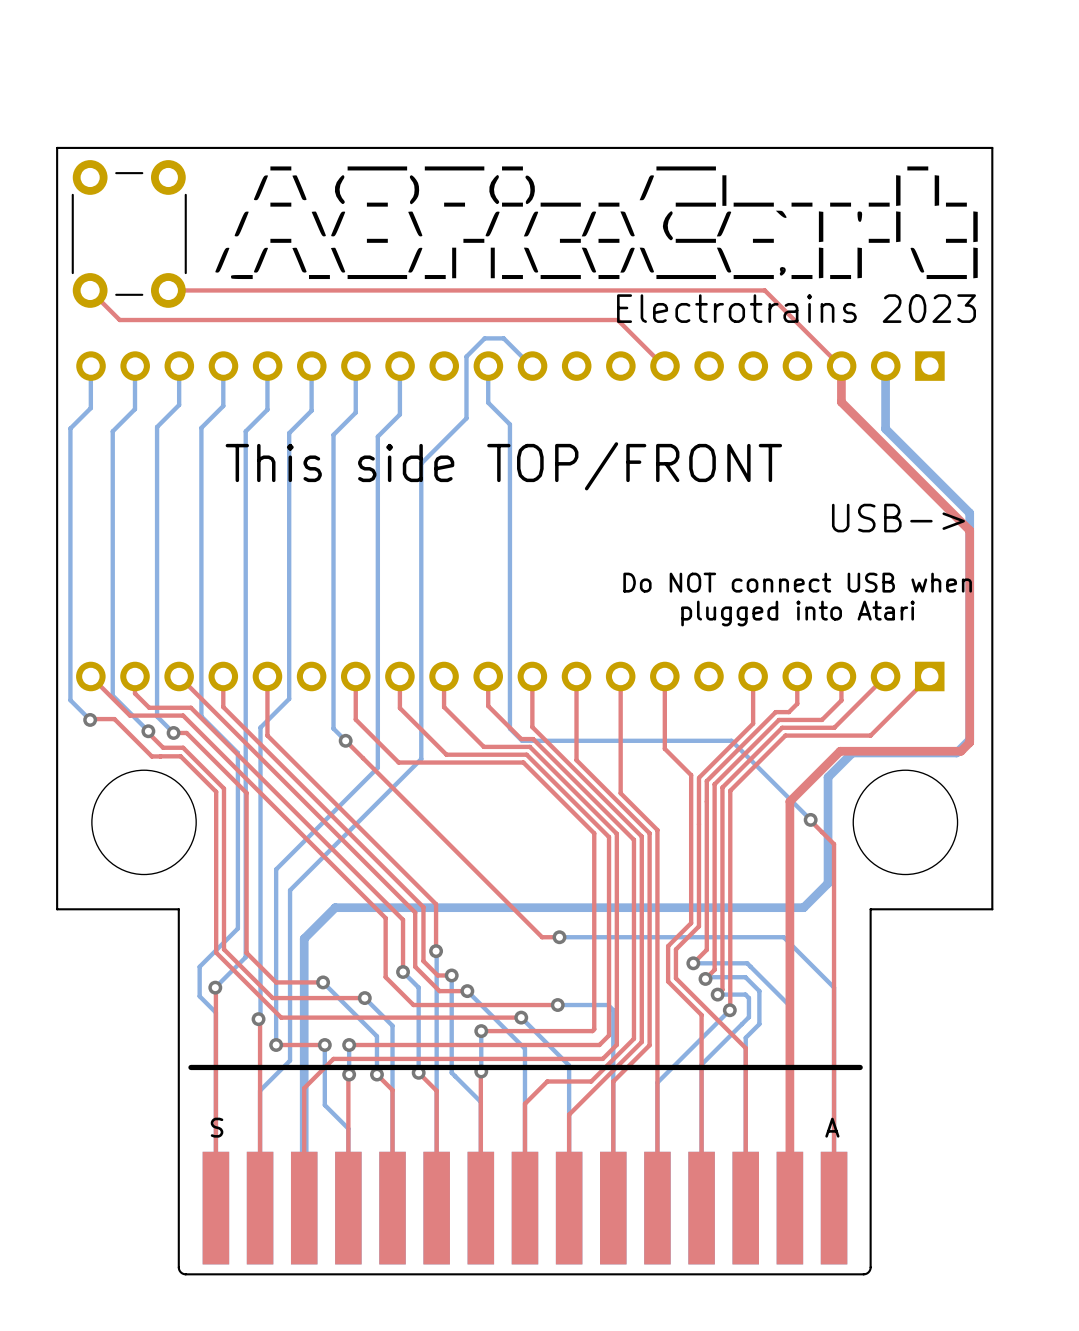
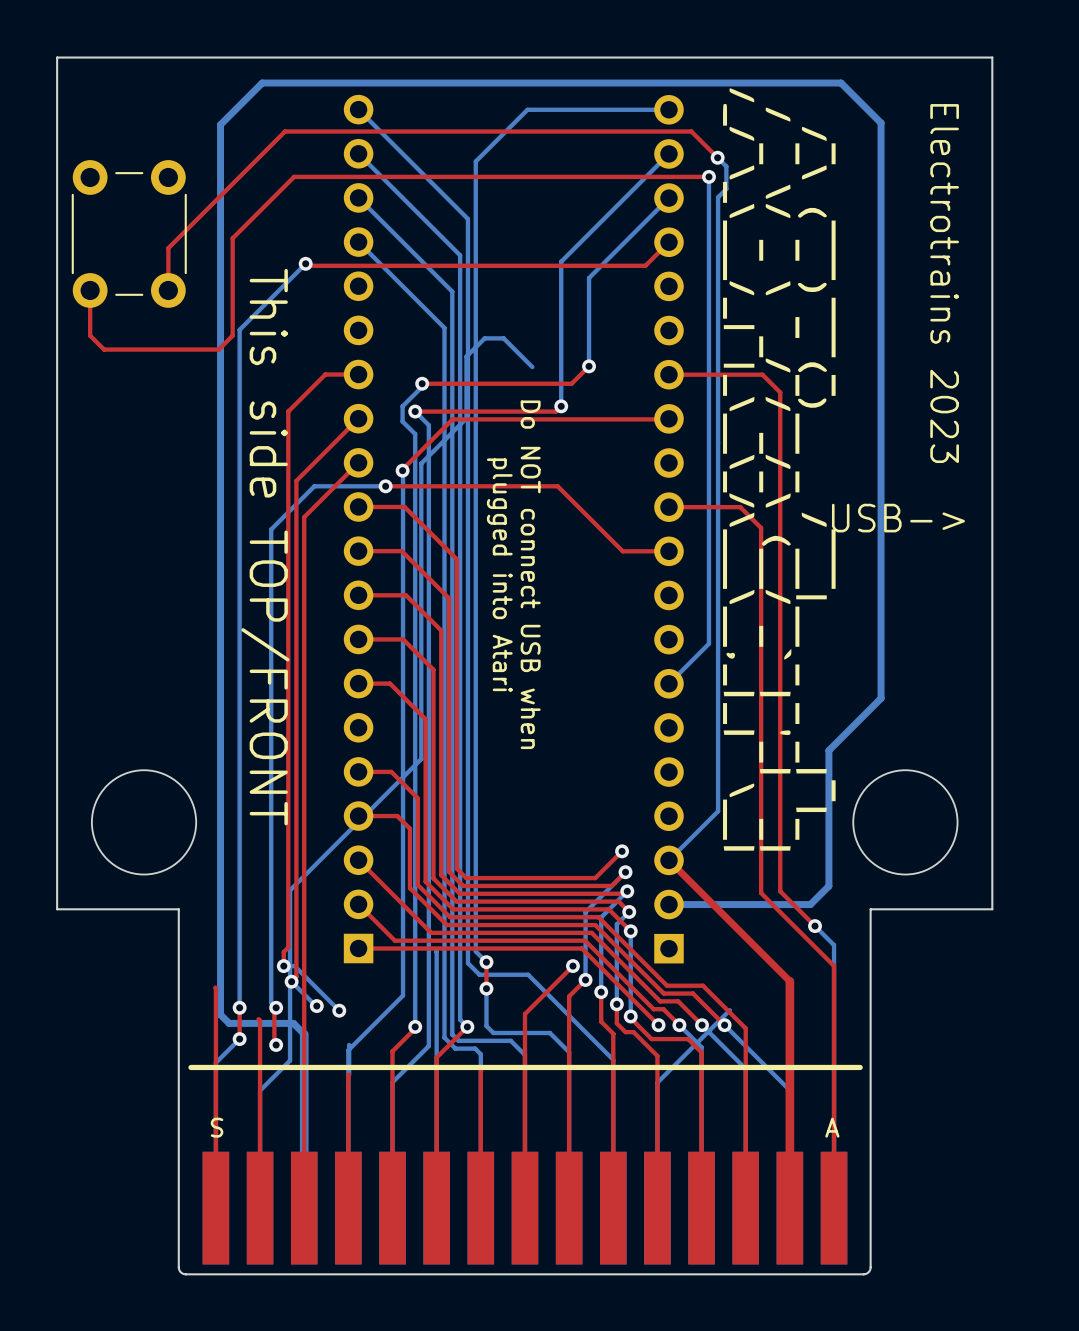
drawing: none -> [723, 88, 836, 851]
bottom track: none -> (668, 109) (527, 109) (475, 161) (475, 951) (486, 962)
bottom track: none -> (358, 153) (460, 255) (460, 1019) (467, 1026)
bottom track: none -> (668, 153) (561, 261) (561, 406)
top track: none -> (717, 157) (691, 131) (285, 131) (168, 248) (168, 290)
bottom track: none -> (717, 157) (726, 166) (726, 189) (718, 197) (718, 811) (668, 860)
via: none -> (717, 157)
drawing: [215, 166, 978, 280] -> none
bottom track: none -> (708, 176) (708, 643) (668, 683)
via: none -> (708, 176)
bottom track: none -> (668, 198) (589, 278) (589, 366)
top track: none -> (668, 242) (645, 265) (307, 265) (305, 263)
bottom track: none -> (305, 263) (239, 329) (239, 1007)
via: none -> (305, 263)
top track: (90, 290) (119, 320) (617, 320) (664, 367) -> (90, 290) (90, 335) (104, 349) (218, 349) (232, 335) (232, 238) (294, 176) (708, 176)
top track: (168, 290) (764, 290) (841, 367) (841, 402) (969, 530) (969, 742) (961, 751) (840, 751) (789, 801) (789, 981) -> (668, 860) (789, 981)
text rotation: 0° (796, 308) -> 90° clockwise (944, 283)
part: (510, 366) -> none
top track: none -> (589, 366) (571, 383) (422, 383)
via: none -> (589, 366)
bottom track: (90, 367) (90, 408) (70, 428) (70, 700) (90, 719) -> none
bottom track: (134, 367) (134, 409) (112, 431) (112, 695) (148, 731) -> none
bottom track: (179, 367) (179, 404) (157, 427) (157, 716) (173, 732) -> none
bottom track: (223, 367) (223, 406) (201, 427) (201, 716) (237, 752) (237, 928) (199, 966) (199, 996) (215, 1012) (215, 1062) -> (239, 1039) (215, 1062)
bottom track: (267, 367) (267, 409) (245, 431) (245, 957) (215, 987) -> none
bottom track: (311, 367) (311, 410) (289, 433) (289, 698) (260, 727) (260, 1017) (258, 1019) -> none
bottom track: (355, 367) (355, 412) (333, 434) (333, 728) (345, 740) -> none
bottom track: (399, 367) (399, 414) (377, 436) (377, 767) (276, 869) (276, 1045) -> none
bottom track: (488, 367) (488, 402) (509, 424) (509, 728) (522, 740) (731, 740) (810, 819) -> none
bottom track: (885, 367) (885, 428) (969, 513) (969, 739) (956, 752) (852, 752) (828, 777) (828, 883) (803, 907) (335, 907) (304, 938) (304, 1034) -> (668, 904) (810, 904) (828, 886) (828, 750) (881, 698) (881, 123) (841, 83) (262, 83) (220, 124) (220, 1014) (229, 1023) (293, 1023) (304, 1034)
top track: none -> (358, 374) (325, 374) (288, 411) (288, 947) (283, 952) (283, 966)
top track: none -> (668, 374) (762, 374) (780, 392) (780, 891) (815, 926)
via: none -> (422, 383)
bottom track: none -> (420, 385) (422, 383) (422, 386) (402, 406) (402, 421) (415, 434) (415, 1026)
top track: none -> (561, 406) (556, 411) (415, 411)
via: none -> (561, 406)
via: none -> (415, 411)
top track: none -> (358, 418) (296, 480) (296, 976) (291, 981)
top track: none -> (668, 418) (452, 419) (402, 470)
text rotation: 0° (503, 466) -> 90° clockwise (265, 547)
via: none -> (402, 470)
top track: none -> (385, 486) (557, 486) (622, 551) (668, 551)
bottom track: none -> (385, 486) (314, 486) (271, 529) (271, 1002) (276, 1007)
via: none -> (385, 486)
top track: none -> (358, 506) (404, 506) (456, 559) (456, 868) (466, 878) (595, 878) (622, 851)
part: none -> (358, 529)
part: none -> (668, 529)
top track: none -> (358, 551) (401, 551) (449, 598) (449, 871) (463, 885) (611, 885) (625, 872)
text rotation: 0° (797, 582) -> 90° clockwise (530, 574)
top track: none -> (358, 595) (405, 595) (441, 630) (441, 875) (459, 893) (624, 893) (627, 891)
text rotation: 0° (798, 613) -> 90° clockwise (499, 575)
top track: none -> (358, 639) (403, 639) (433, 669) (433, 878) (456, 901) (618, 901) (629, 911)
part: none -> (524, 665)
top track: (90, 676) (129, 715) (183, 715) (385, 918) (385, 977) (413, 1005) (557, 1005) -> none
top track: (134, 676) (134, 693) (149, 707) (190, 707) (403, 919) (403, 971) -> none
top track: (179, 676) (415, 912) (415, 966) (439, 991) (467, 991) -> none
top track: (223, 676) (223, 707) (423, 907) (423, 961) (437, 975) (451, 975) -> none
top track: (267, 676) (267, 735) (436, 904) (436, 951) -> none
top track: (355, 676) (355, 719) (398, 762) (523, 762) (594, 833) (594, 1029) (592, 1031) (481, 1031) -> none
top track: (399, 676) (399, 708) (446, 754) (526, 754) (609, 837) (609, 1035) (599, 1045) (349, 1045) -> none
top track: (444, 676) (444, 707) (483, 746) (529, 746) (616, 833) (616, 1004) -> none
top track: (488, 676) (488, 706) (521, 739) (533, 739) (633, 839) (633, 1038) (591, 1081) (547, 1081) (524, 1103) -> (572, 966) (524, 1014) (524, 1103)
part: (510, 676) -> none
top track: (532, 676) (532, 727) (641, 836) (641, 1042) (569, 1114) -> (585, 979) (569, 996) (569, 1114)
top track: (576, 676) (576, 760) (649, 833) (649, 1045) (613, 1081) -> (613, 1033) (613, 1081)
top track: (620, 676) (620, 793) (657, 830) (657, 1055) -> (616, 1023) (625, 1032) (633, 1032) (657, 1055)
top track: (664, 676) (664, 748) (691, 775) (691, 923) (668, 946) (668, 981) (701, 1015) (701, 1052) -> (630, 1016) (651, 1039) (688, 1039) (701, 1052)
top track: (753, 676) (753, 723) (699, 776) -> none
top track: (797, 676) (797, 703) (788, 712) (775, 712) (706, 781) (706, 949) (693, 963) -> none
top track: (841, 676) (841, 700) (821, 719) (778, 719) (714, 784) (714, 969) (705, 978) -> none
top track: (885, 676) (834, 727) (782, 727) (722, 787) (722, 989) (717, 994) -> none
top track: (929, 676) (870, 735) (785, 735) (730, 790) (729, 1010) -> none
top track: none -> (358, 683) (390, 683) (425, 719) (425, 881) (453, 909) (608, 909) (630, 931)
part: (524, 711) -> none
via: (90, 719) -> none
top track: (91, 719) (114, 719) (151, 756) (160, 756) -> none
top track: (148, 731) (163, 747) (183, 747) (223, 788) (223, 949) (272, 998) (364, 998) -> none
via: (148, 731) -> none
top track: (173, 732) (186, 732) (246, 792) (246, 952) (276, 982) (323, 982) -> none
via: (173, 732) -> none
top track: (345, 740) (542, 937) (559, 937) -> none
via: (345, 740) -> none
top track: (160, 756) (180, 756) (216, 791) (216, 952) (281, 1017) (521, 1017) -> none
top track: (698, 777) (698, 926) (675, 949) (675, 978) (745, 1048) -> (358, 771) (391, 771) (417, 798) (417, 884) (450, 917) (598, 917) (667, 985) (703, 985) (745, 1028) (745, 1048)
top track: none -> (358, 816) (397, 816) (409, 828) (409, 888) (446, 925) (595, 925) (663, 993) (693, 993) (724, 1025)
top track: (810, 819) (834, 844) (834, 965) -> (668, 507) (740, 507) (761, 528) (761, 893) (834, 965)
via: (810, 819) -> none
via: none -> (622, 851)
top track: none -> (358, 860) (431, 932) (591, 932) (660, 1001) (678, 1001) (702, 1025)
bottom track: none -> (625, 872) (585, 912) (585, 979)
via: none -> (625, 872)
bottom track: none -> (627, 891) (601, 917) (601, 992)
via: none -> (627, 891)
top track: none -> (358, 904) (394, 940) (585, 940) (653, 1009) (663, 1009) (679, 1025)
bottom track: none -> (629, 911) (616, 924) (616, 1004)
via: none -> (629, 911)
via: none -> (815, 926)
bottom track: none -> (630, 931) (630, 1016)
via: none -> (630, 931)
bottom track: (559, 937) (783, 937) (834, 987) -> (815, 926) (834, 945) (834, 987)
via: (559, 937) -> none
top track: none -> (358, 948) (581, 948) (658, 1025)
via: (436, 951) -> none
top track: none -> (486, 962) (486, 988)
via: none -> (486, 962)
bottom track: (693, 963) (747, 963) (789, 1005) (789, 1090) -> (724, 1025) (789, 1090)
via: (693, 963) -> none
bottom track: none -> (283, 966) (294, 966) (339, 1010)
via: none -> (283, 966)
via: none -> (572, 966)
bottom track: (403, 971) (418, 987) (418, 1072) -> none
via: (403, 971) -> none
bottom track: (451, 975) (451, 1072) (480, 1101) -> (358, 242) (444, 327) (444, 1037) (455, 1048) (475, 1048) (480, 1054) (480, 1101)
via: (451, 975) -> none
bottom track: (705, 978) (707, 977) (745, 977) (759, 991) (759, 1024) (745, 1037) (745, 1068) -> (702, 1025) (745, 1068)
via: (705, 978) -> none
via: none -> (585, 979)
bottom track: none -> (291, 981) (316, 1006)
via: none -> (291, 981)
bottom track: (323, 982) (376, 1036) (376, 1074) -> none
via: (323, 982) -> none
via: (215, 987) -> none
via: none -> (486, 988)
bottom track: (467, 991) (524, 1048) (524, 1054) -> (358, 197) (452, 291) (452, 1034) (458, 1040) (510, 1040) (524, 1054)
via: (467, 991) -> none
top track: none -> (601, 992) (601, 1021) (613, 1033)
via: none -> (601, 992)
bottom track: (717, 994) (745, 994) (748, 998) (748, 1017) (701, 1064) -> (679, 1025) (701, 1047) (701, 1064)
via: (717, 994) -> none
bottom track: (364, 998) (392, 1025) (392, 1082) -> (415, 411) (428, 425) (428, 1046) (392, 1082)
via: (364, 998) -> none
via: none -> (616, 1004)
bottom track: (557, 1005) (608, 1005) (613, 1010) (613, 1059) -> (358, 109) (467, 219) (467, 963) (479, 974) (528, 974) (613, 1059)
via: (557, 1005) -> none
via: none -> (316, 1006)
top track: none -> (239, 1007) (239, 1039)
via: none -> (239, 1007)
top track: none -> (276, 1007) (274, 1009) (274, 1040)
via: none -> (276, 1007)
via: none -> (339, 1010)
via: (729, 1010) -> none
via: none -> (630, 1016)
bottom track: (521, 1017) (569, 1065) -> (486, 988) (486, 1026) (493, 1032) (549, 1032) (569, 1052) (569, 1065)
via: (521, 1017) -> none
via: (258, 1019) -> none
top track: (616, 1023) (616, 1044) (602, 1058) (333, 1058) (304, 1088) -> (358, 462) (304, 517) (304, 1088)
via: none -> (658, 1025)
via: none -> (679, 1025)
via: none -> (702, 1025)
via: none -> (724, 1025)
via: none -> (415, 1026)
bottom track: (481, 1031) (481, 1071) -> none
via position: (481, 1031) -> (467, 1026)
via: none -> (239, 1039)
top track: (276, 1045) (324, 1045) -> none
bottom track: (324, 1045) (324, 1105) (348, 1128) -> (402, 470) (403, 995) (348, 1050) (348, 1128)
via: (324, 1045) -> none
via: (349, 1045) -> none
via: (481, 1071) -> none
top track: (418, 1072) (436, 1090) -> (467, 1026) (436, 1057) (436, 1090)
via: (418, 1072) -> none
via: (349, 1074) -> none
top track: (376, 1074) (392, 1090) -> (415, 1026) (392, 1051) (392, 1090)
via: (376, 1074) -> none

